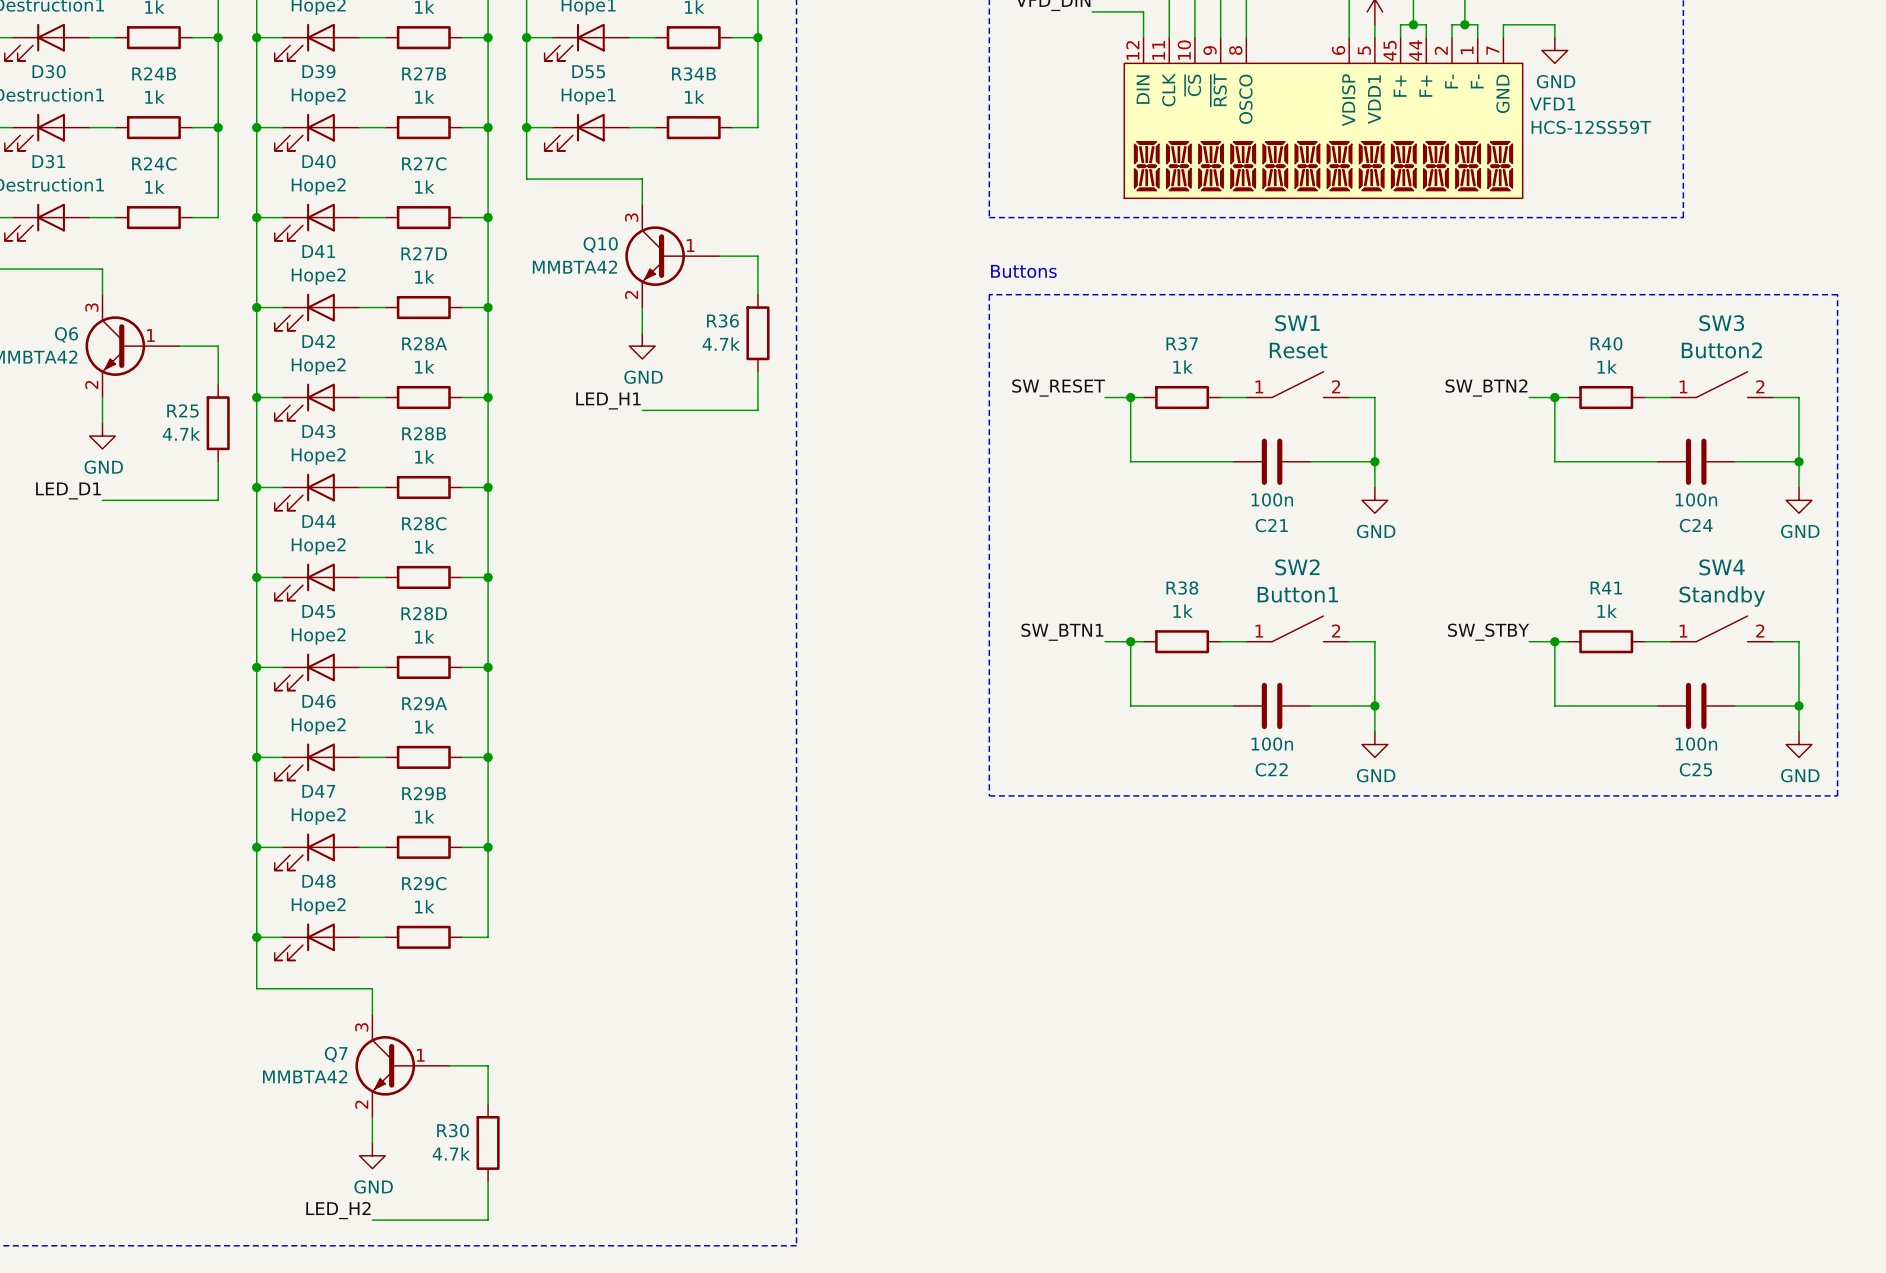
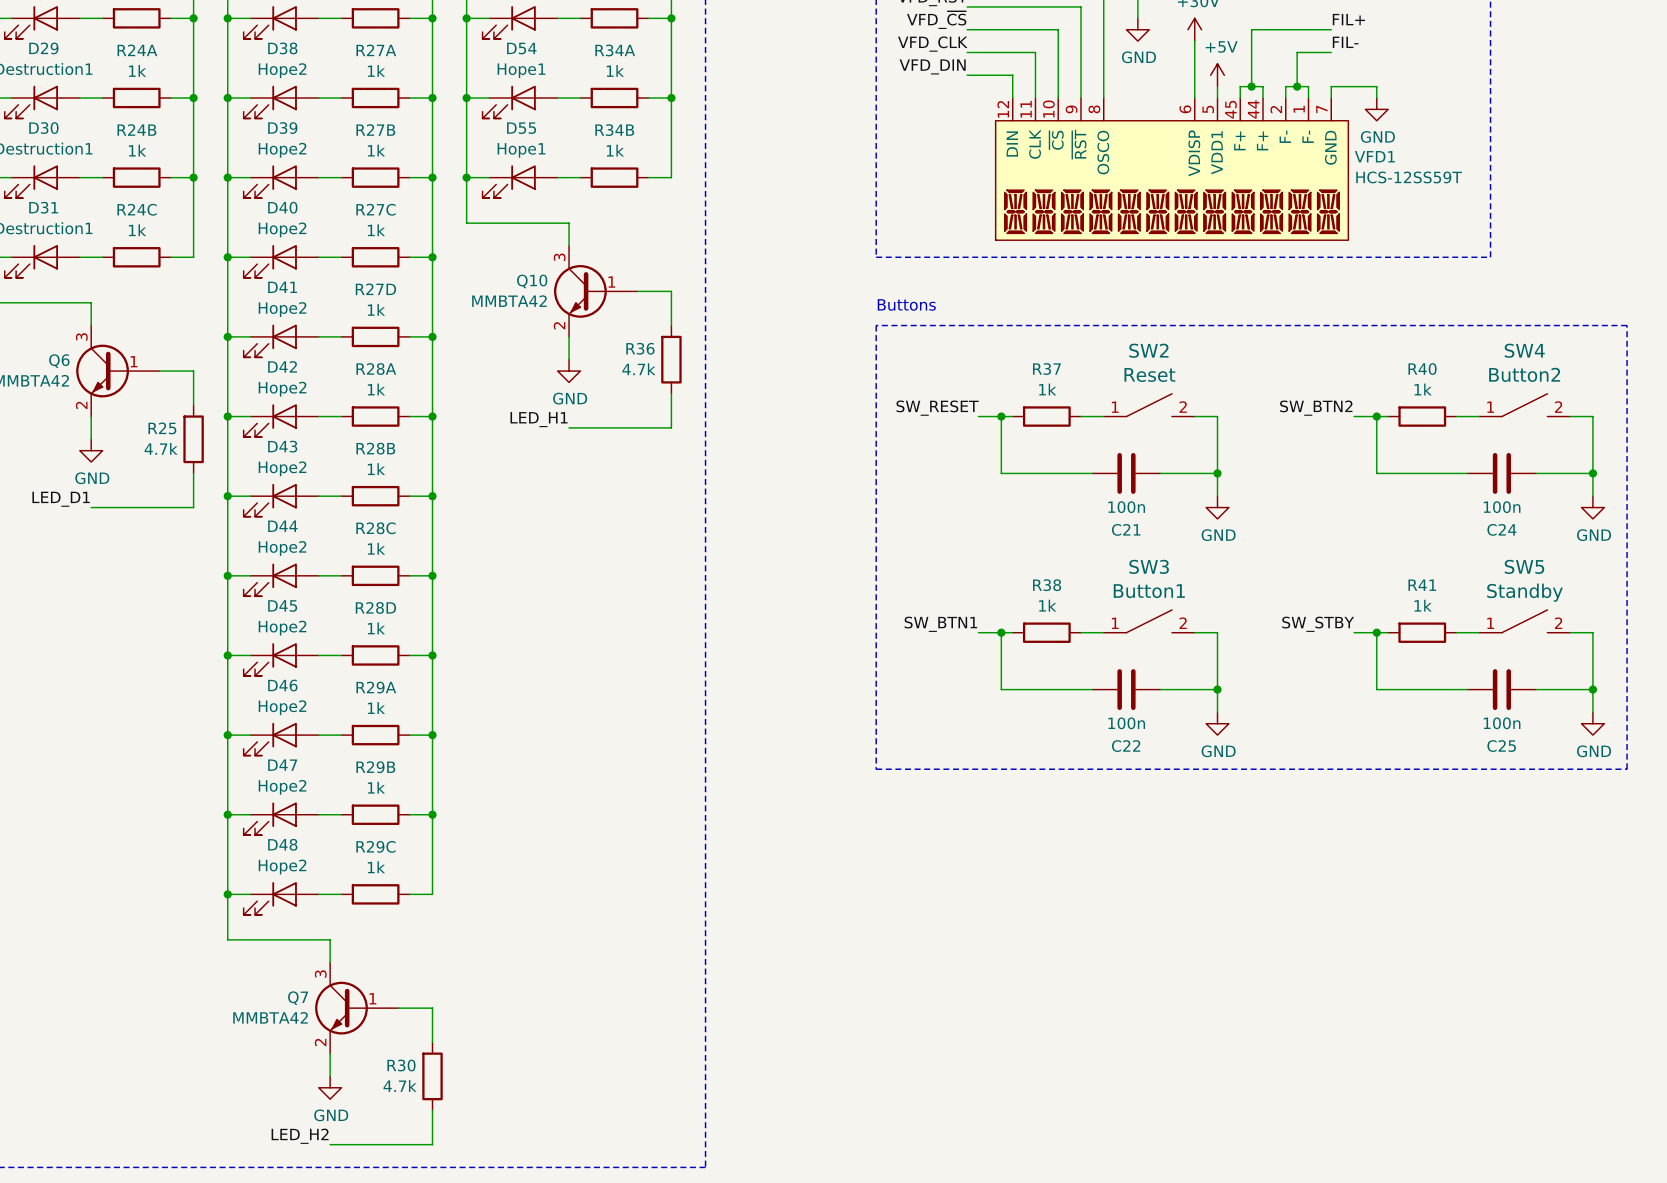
SW1 name: SW1 (1297, 323) -> SW2 (1148, 350)
SW3 name: SW3 (1721, 323) -> SW4 (1524, 350)
SW2 name: SW2 (1297, 567) -> SW3 (1149, 566)
SW4 name: SW4 (1722, 567) -> SW5 (1524, 566)

